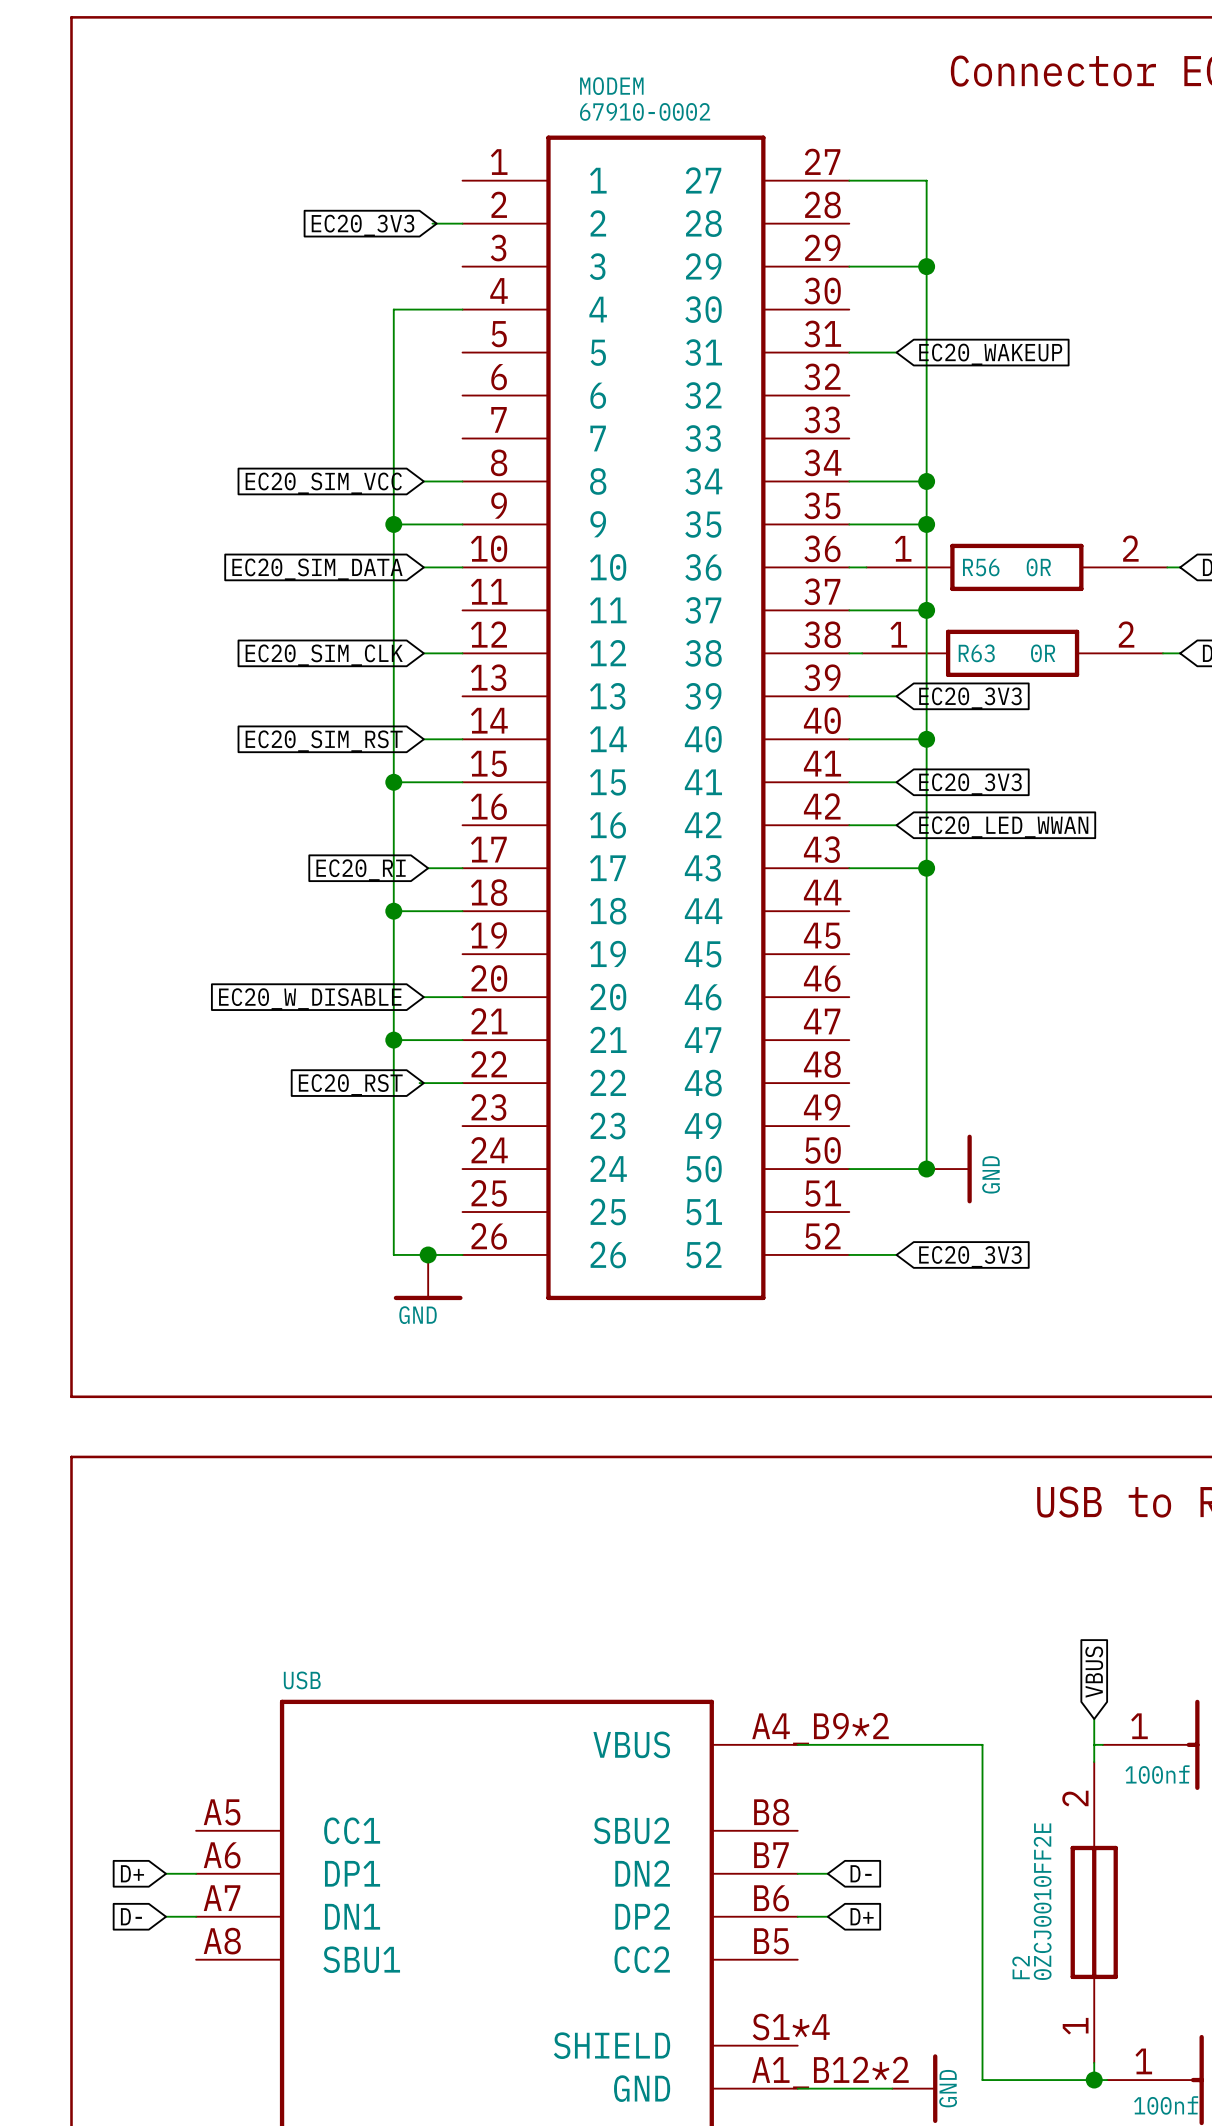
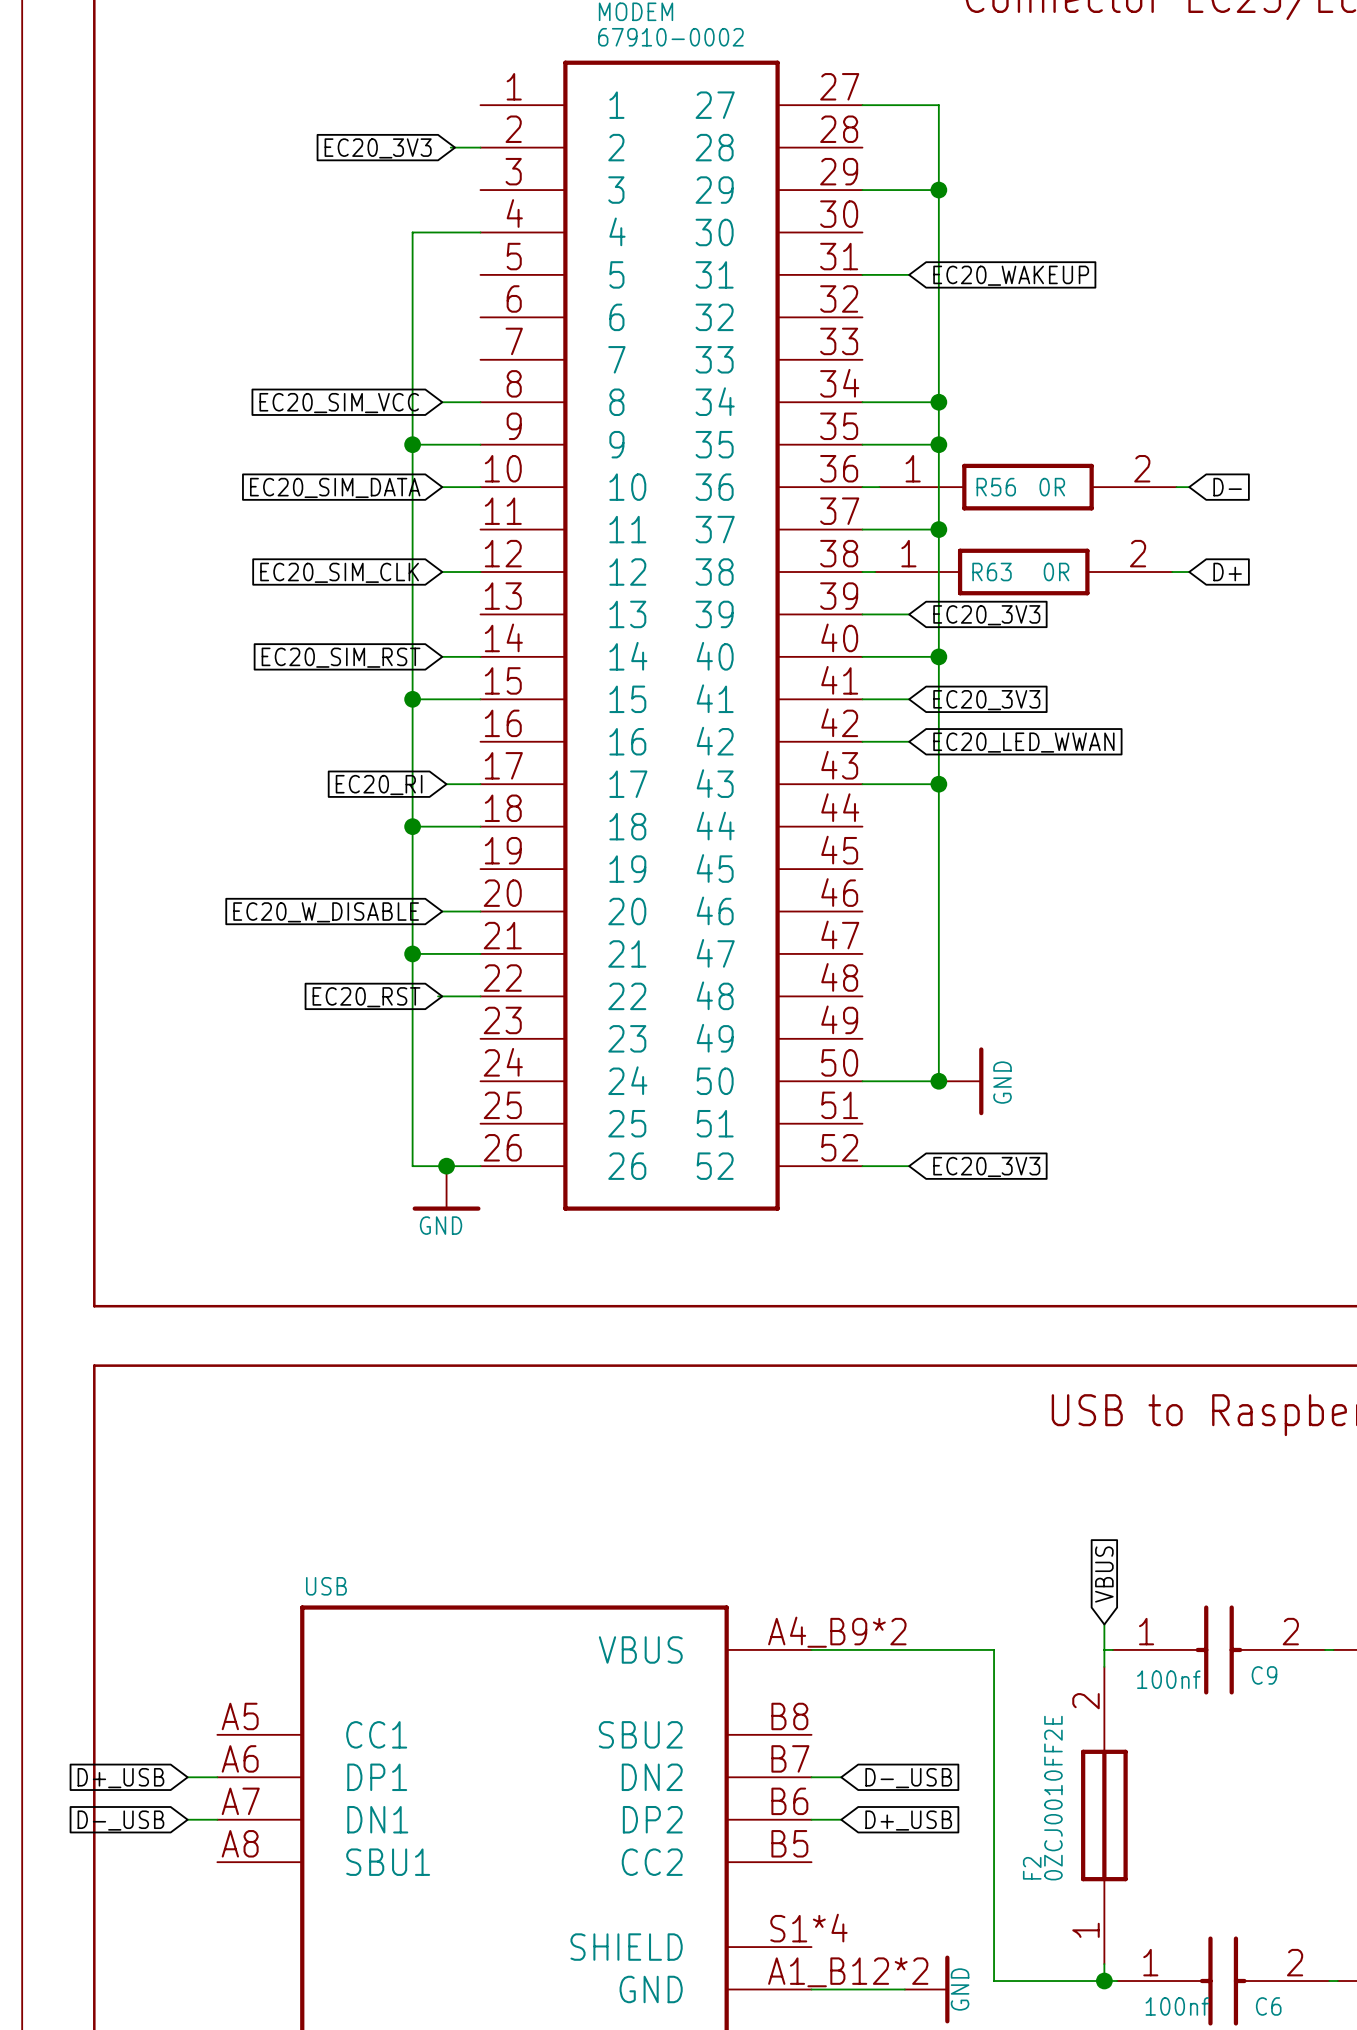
global label: D+ (132, 1873) -> D+_USB (120, 1778)
global label: D- (861, 1873) -> D-_USB (908, 1778)
global label: D- (131, 1916) -> D-_USB (120, 1820)
global label: D+ (862, 1916) -> D+_USB (908, 1820)

